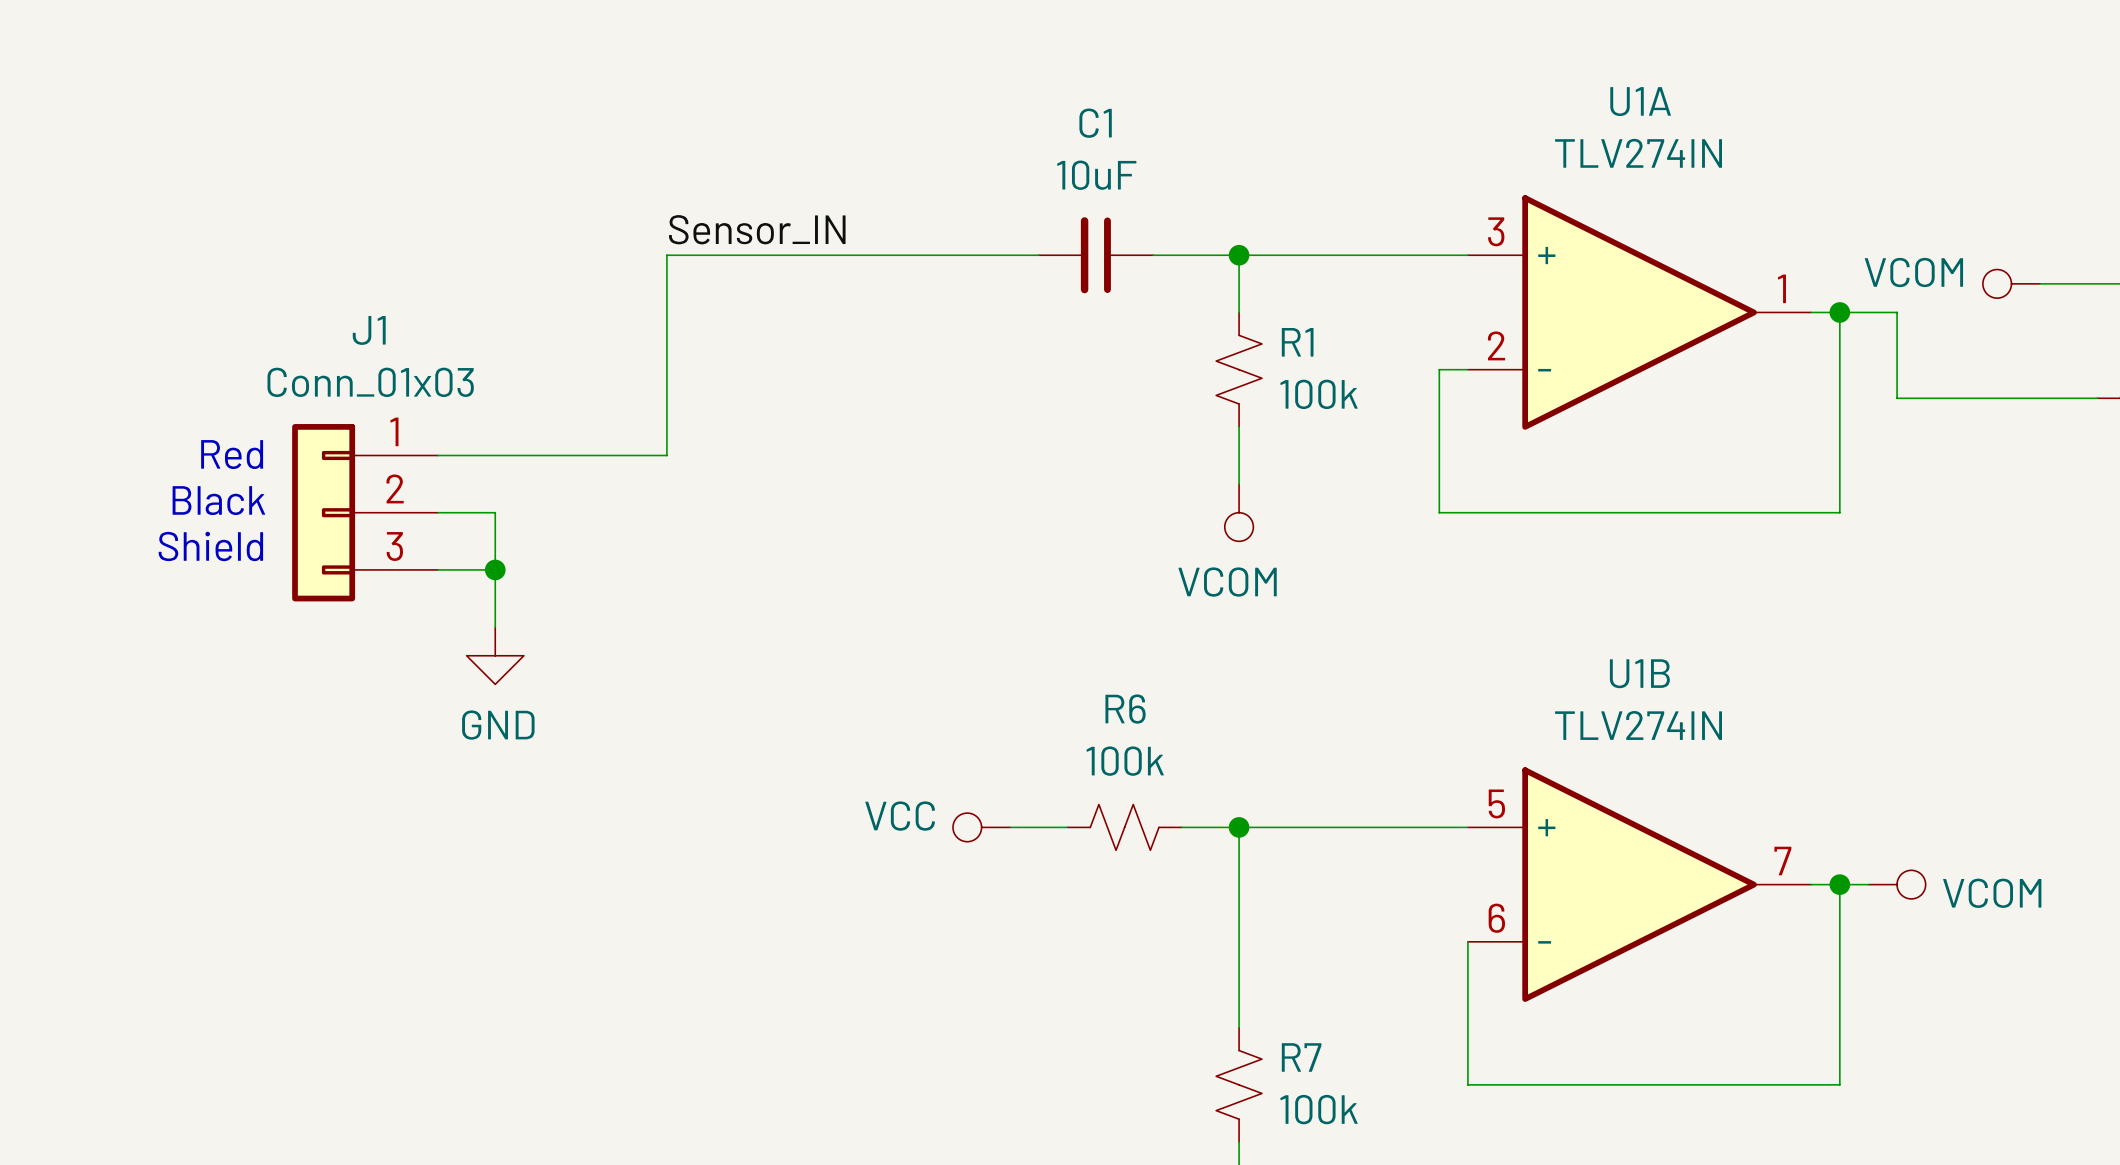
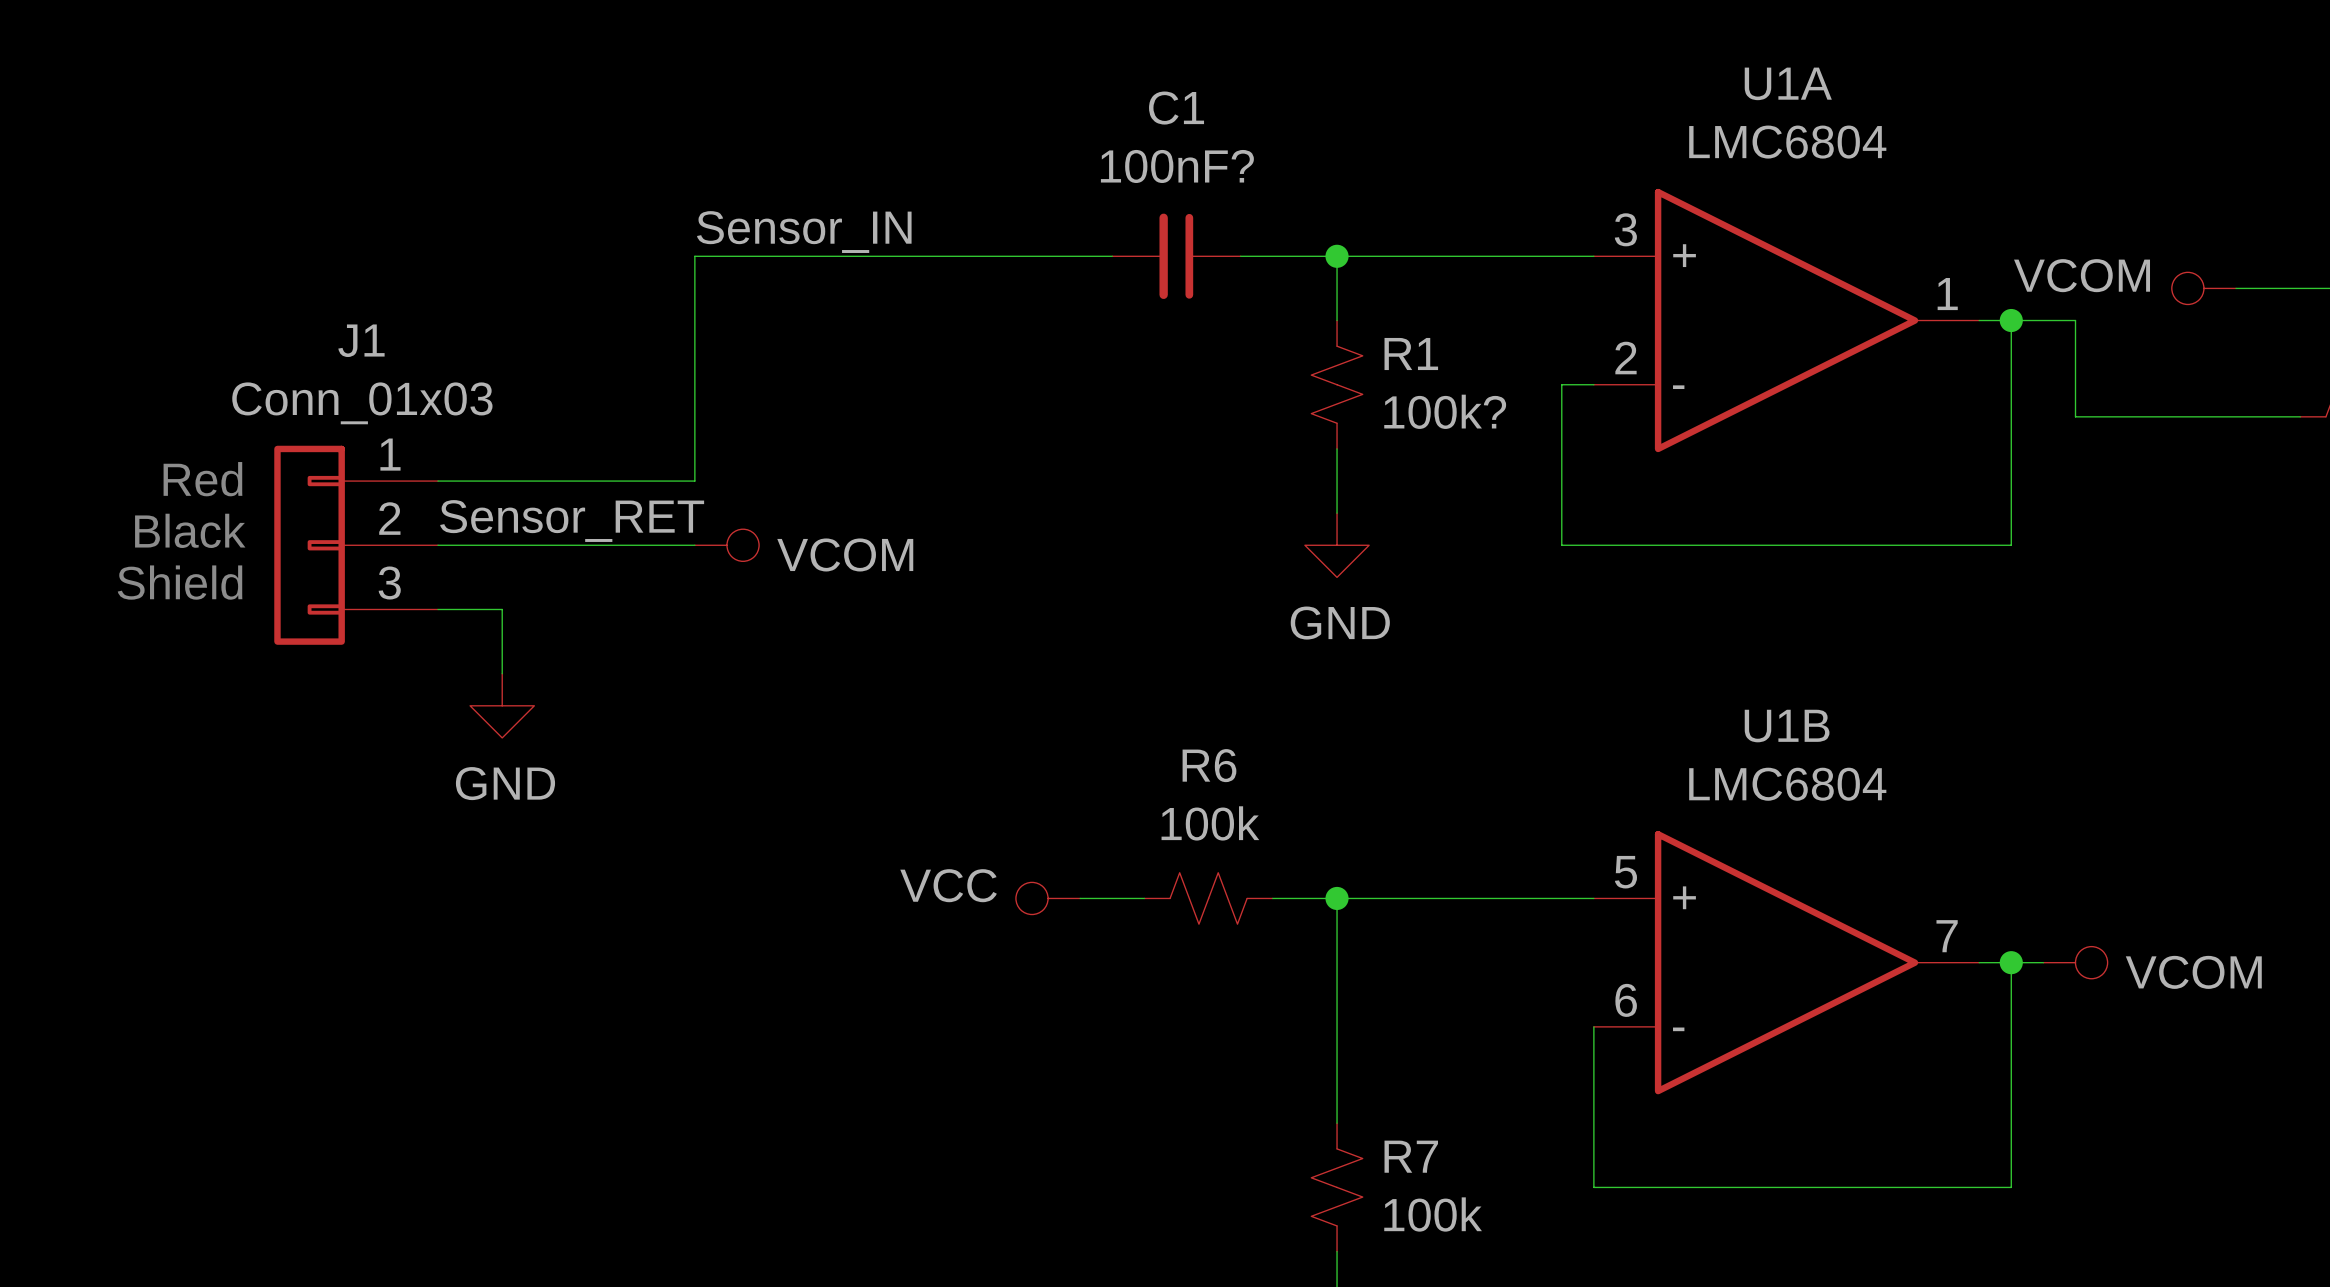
U1A value: TLV274IN (1638, 153) -> LMC6804 (1787, 142)
C1 value: 10uF (1096, 175) -> 100nF? (1177, 166)
R1 value: 100k (1319, 394) -> 100k? (1445, 411)
label: none -> Sensor_RET (572, 521)
wire: (495, 512) (495, 569) -> (502, 545) (694, 545)
power symbol: none -> VCOM (726, 545)
power symbol: VCOM (1239, 512) -> GND (1337, 545)
junction: (495, 569) -> none
U1B value: TLV274IN (1638, 725) -> LMC6804 (1787, 784)

